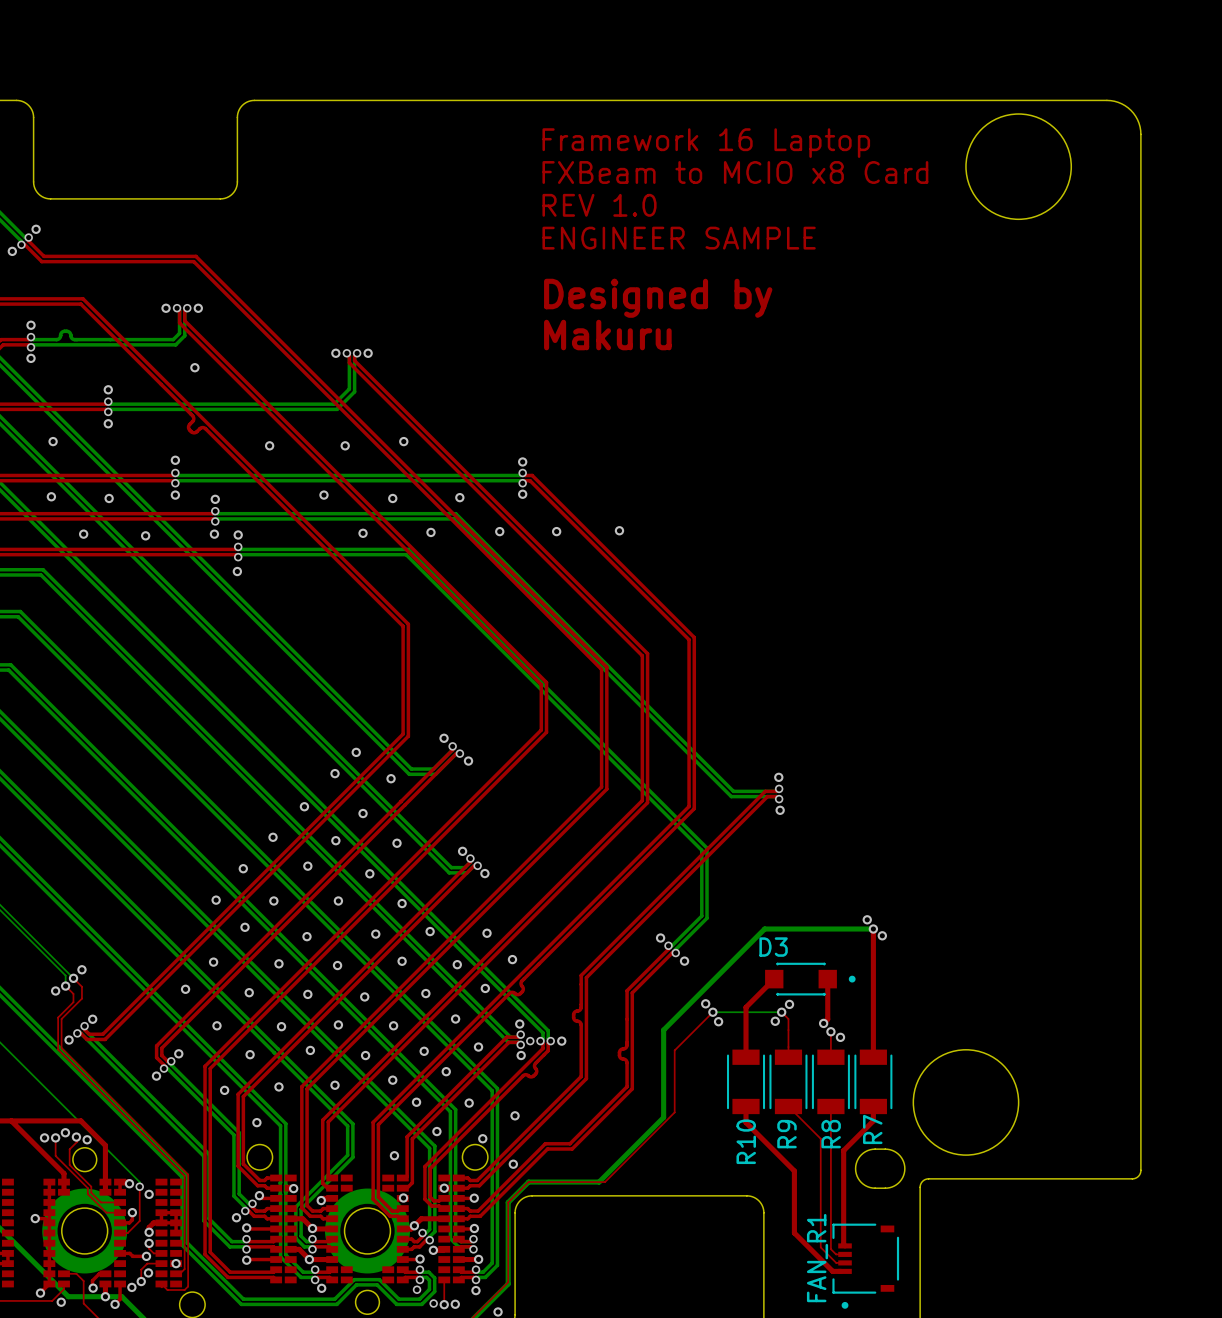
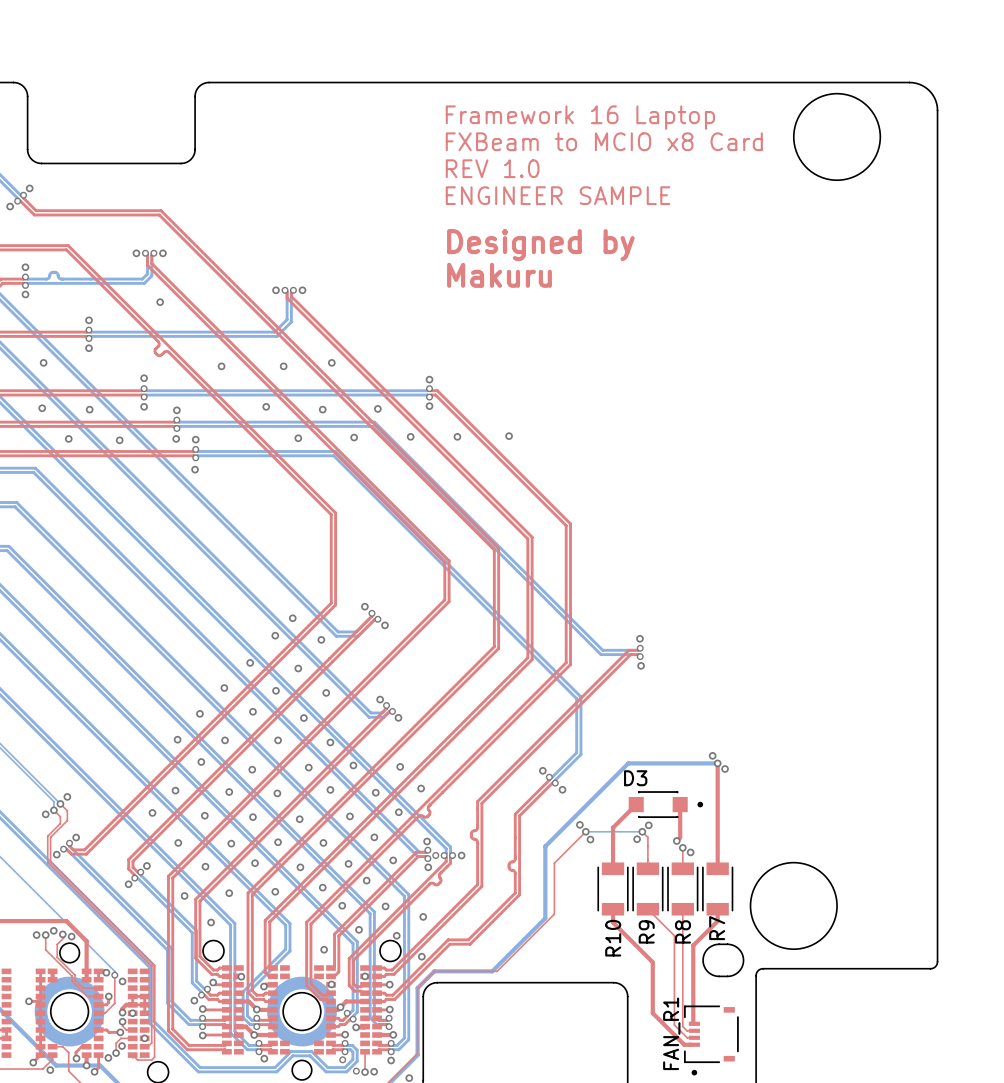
top track: (11, 1120) (63, 1173) (63, 1182) -> none
via: none -> (132, 1013)

